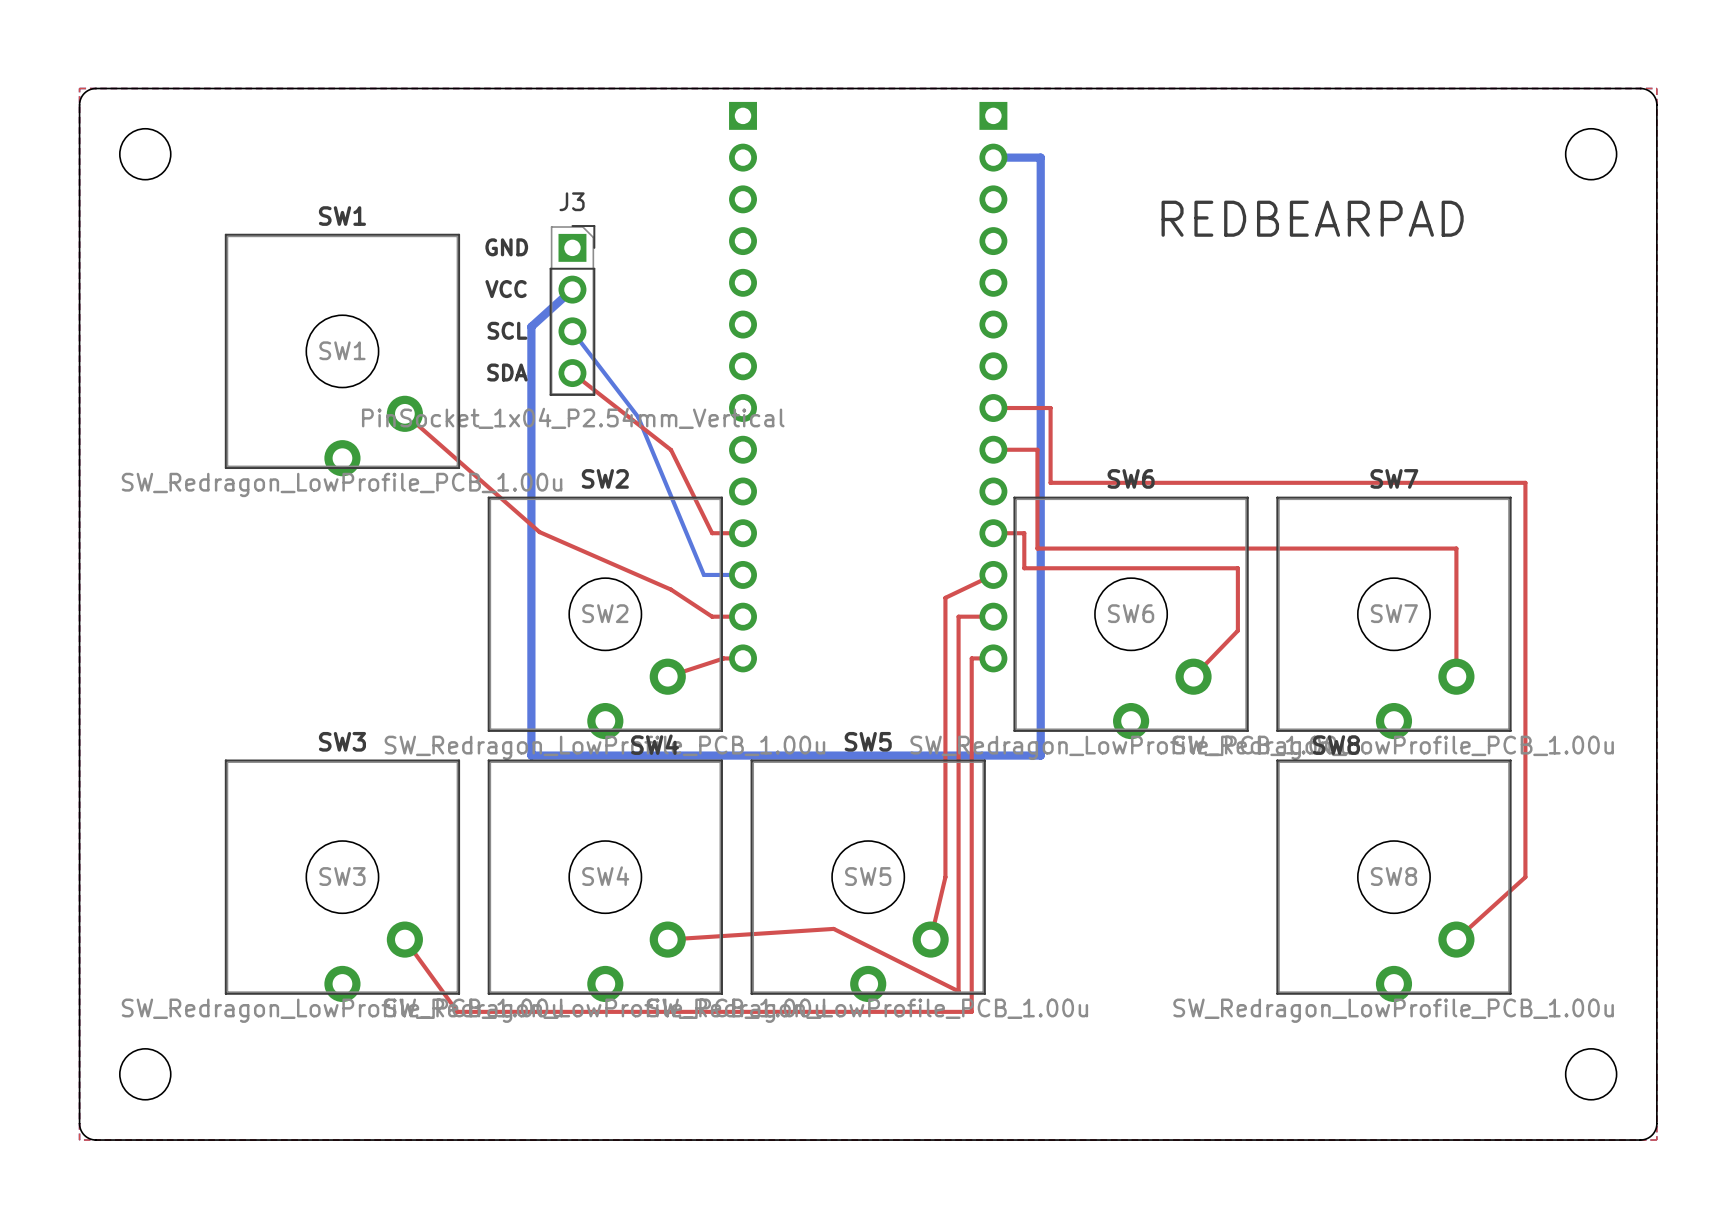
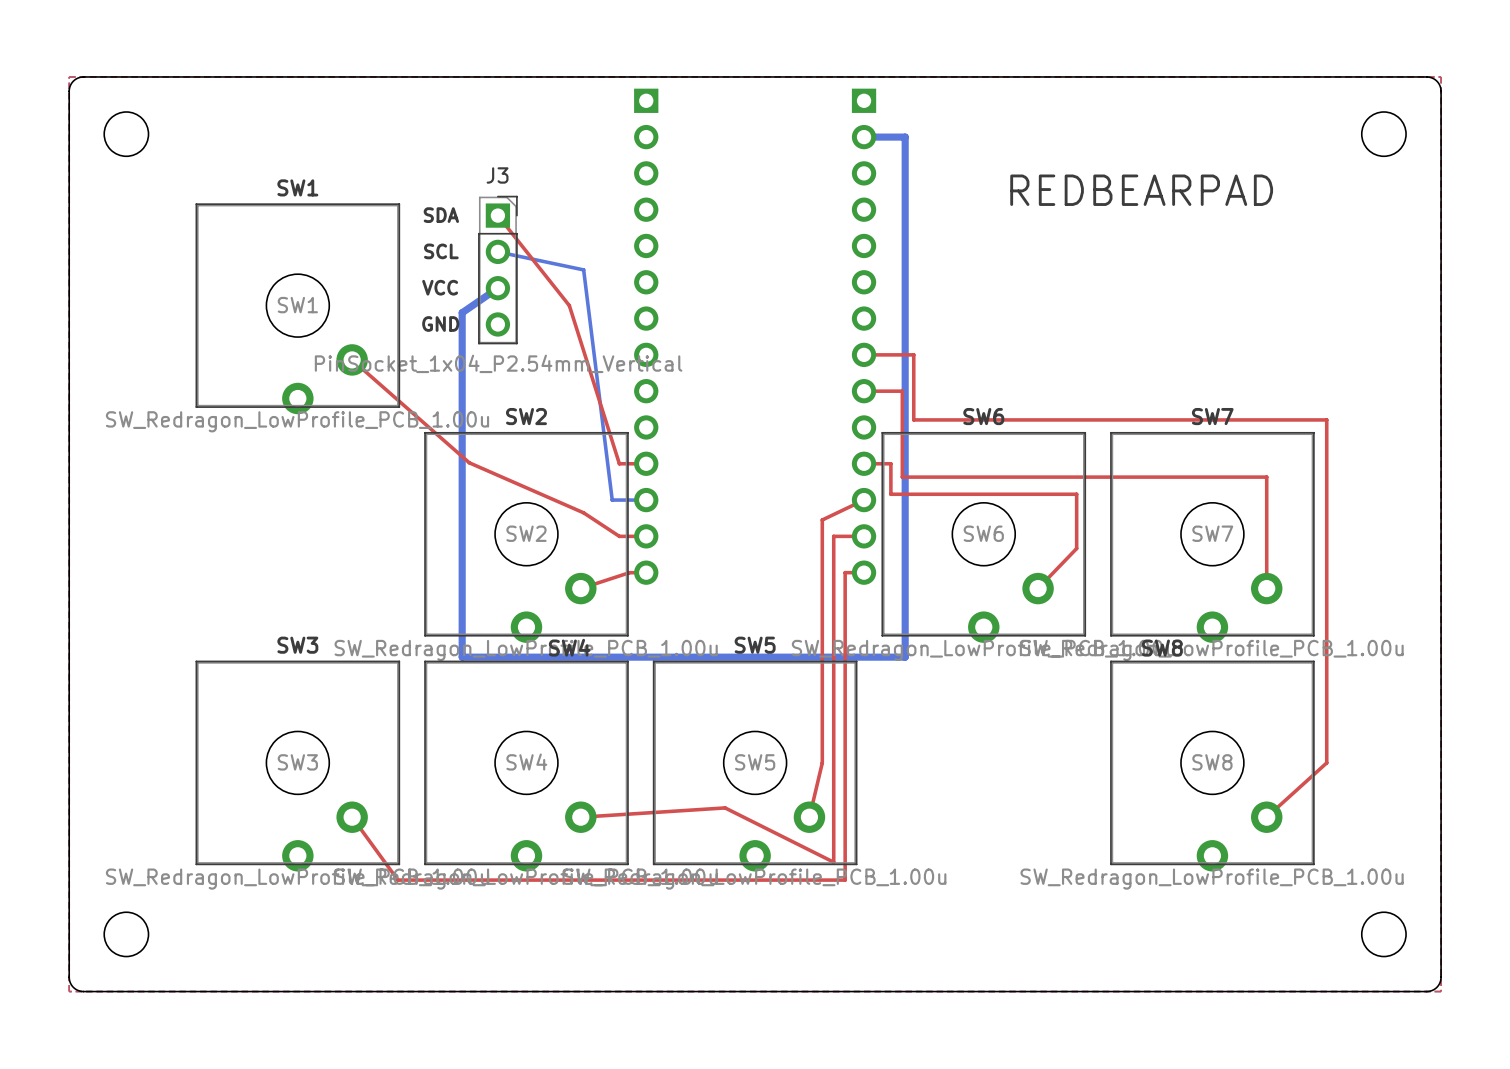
text: GND (506, 247) -> SDA (441, 215)
text: VCC (506, 289) -> SCL (441, 251)
bottom track: (572, 289) (531, 326) (531, 359) -> (497, 288) (462, 312)
text: SCL (507, 330) -> VCC (440, 287)
bottom track: (572, 331) (638, 417) (703, 574) -> (497, 251) (583, 269) (612, 500)
text: SDA (507, 372) -> GND (440, 324)
top track: (572, 373) (671, 449) (712, 533) -> (497, 215) (569, 305) (619, 463)

